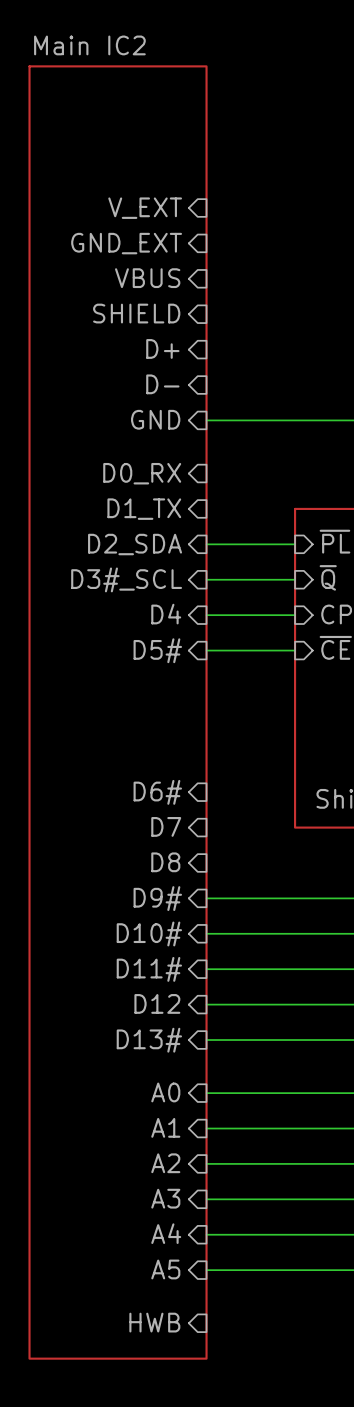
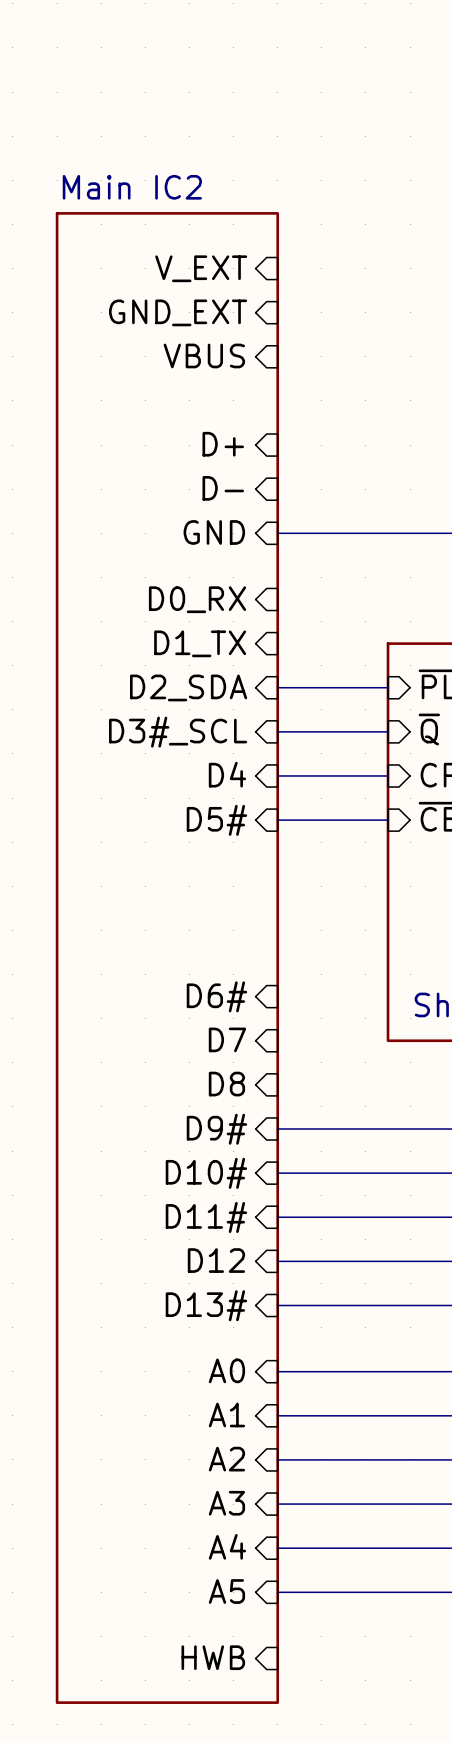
sheet Main IC2 name position: Main IC2 (89, 45) -> Main IC2 (132, 187)
sheet Main IC2 shape: [28, 65, 208, 1360] -> [55, 212, 280, 1704]
sheet pin: SHIELD (136, 313) -> none

